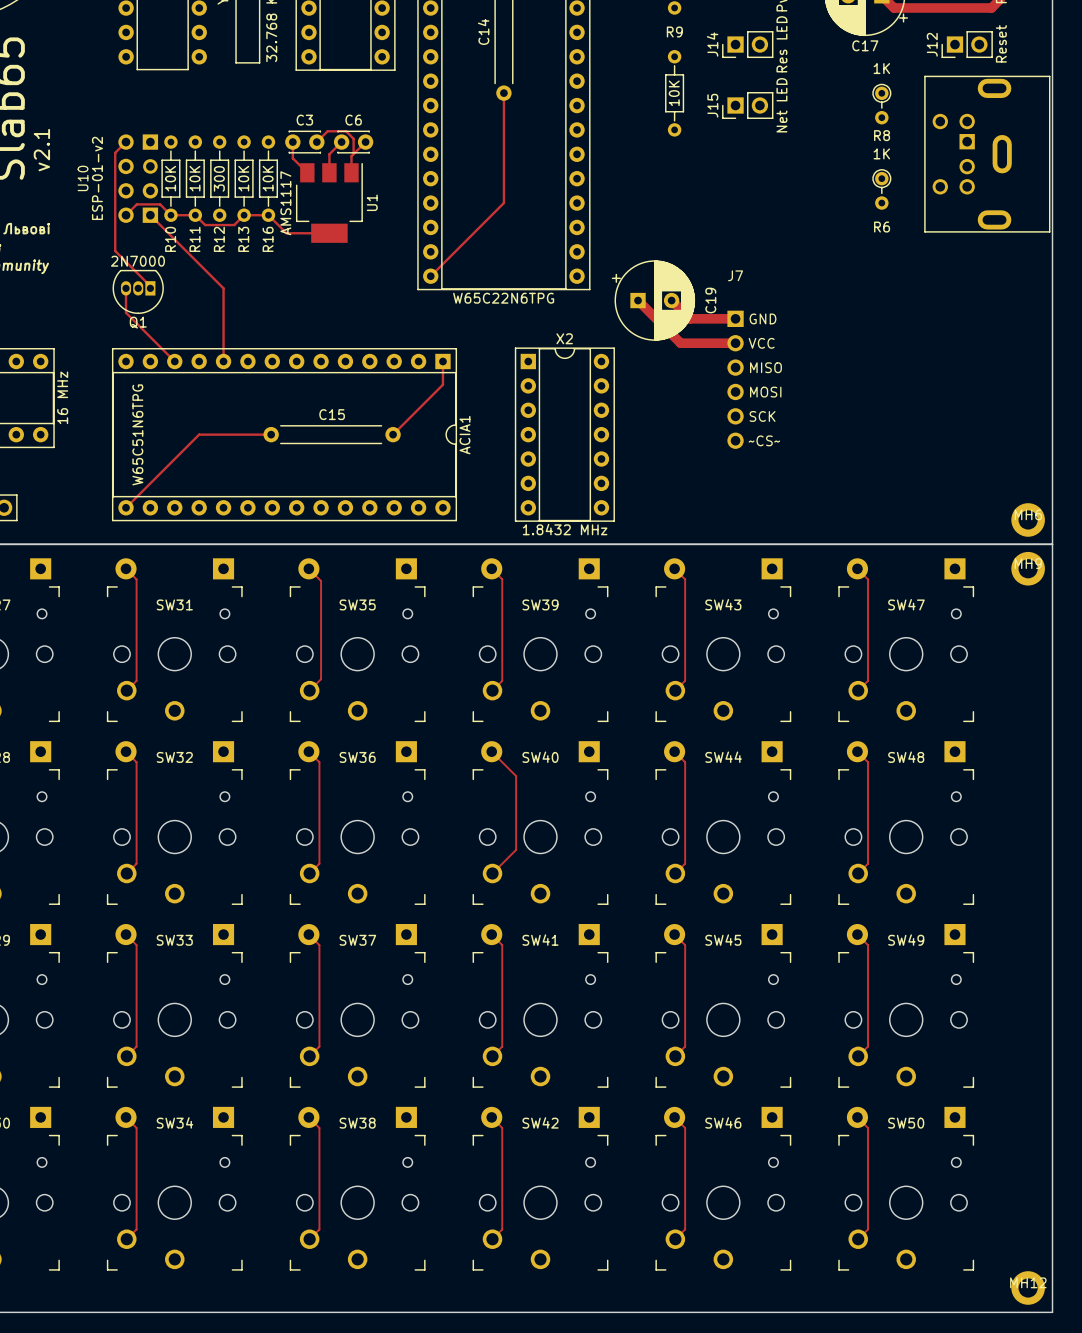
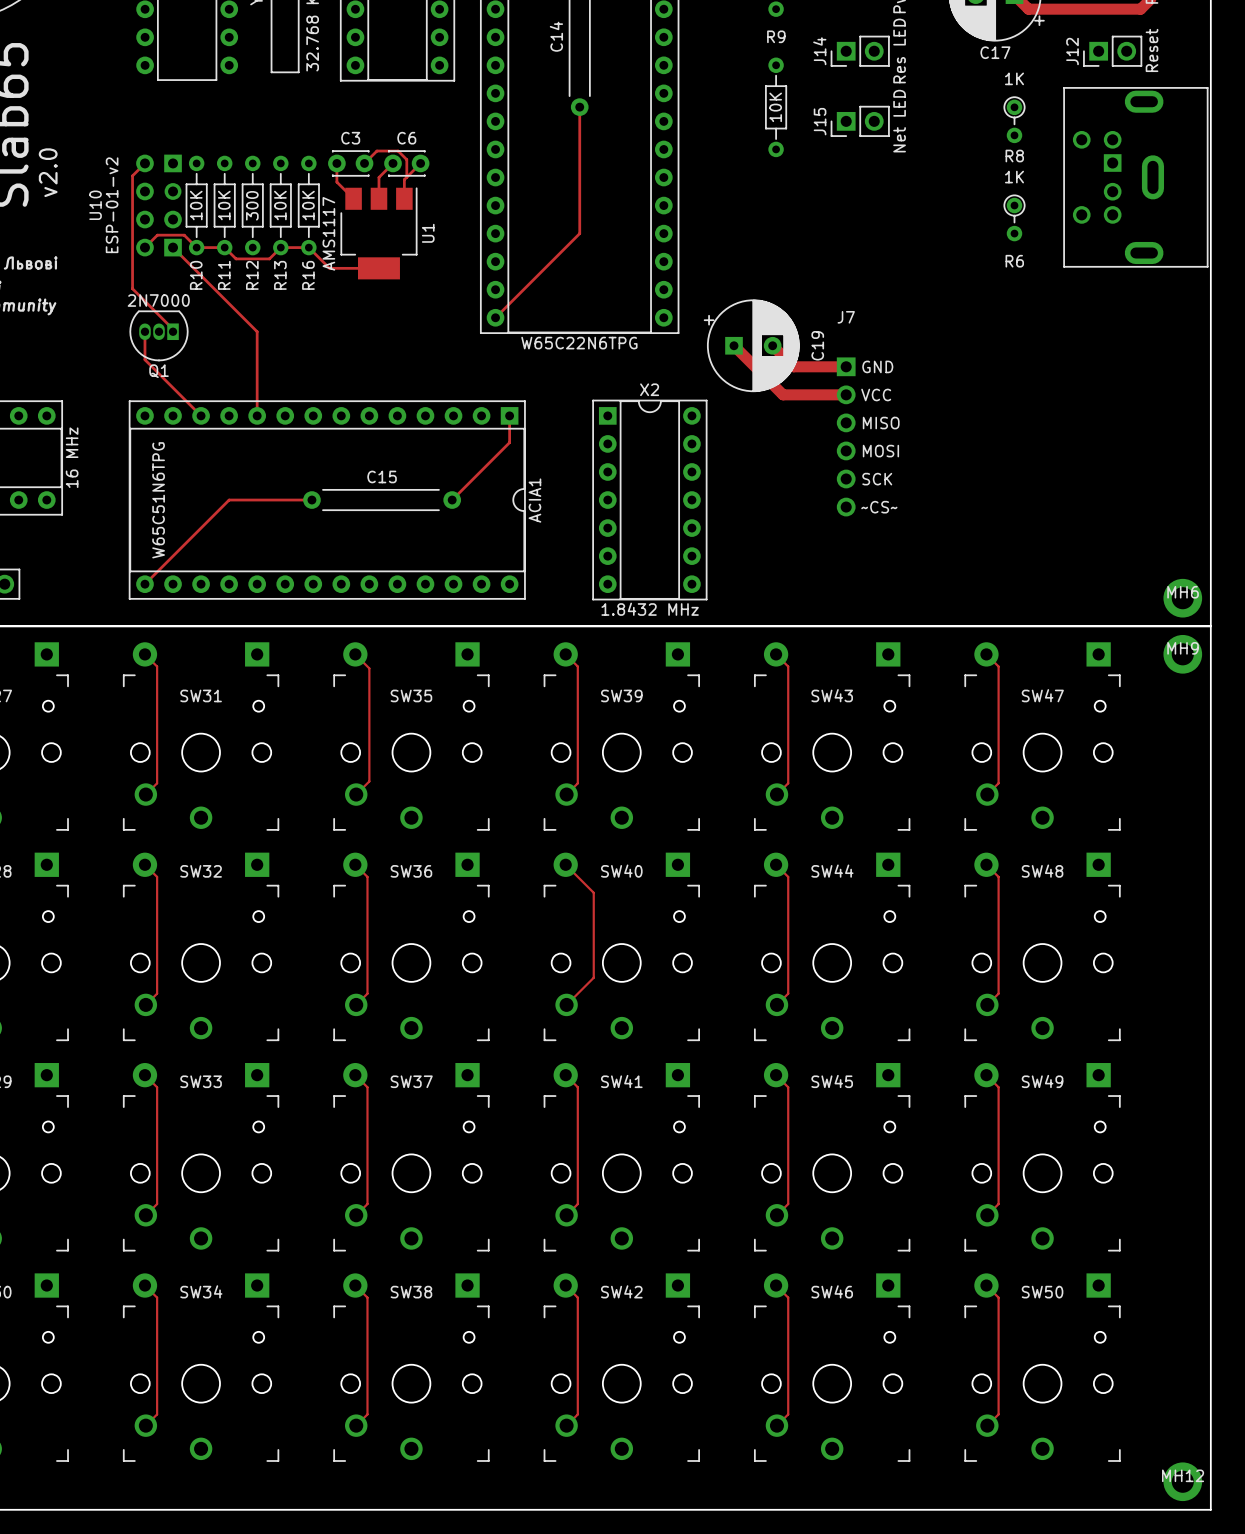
text: v2.1 (41, 150) -> v2.0 (48, 172)

